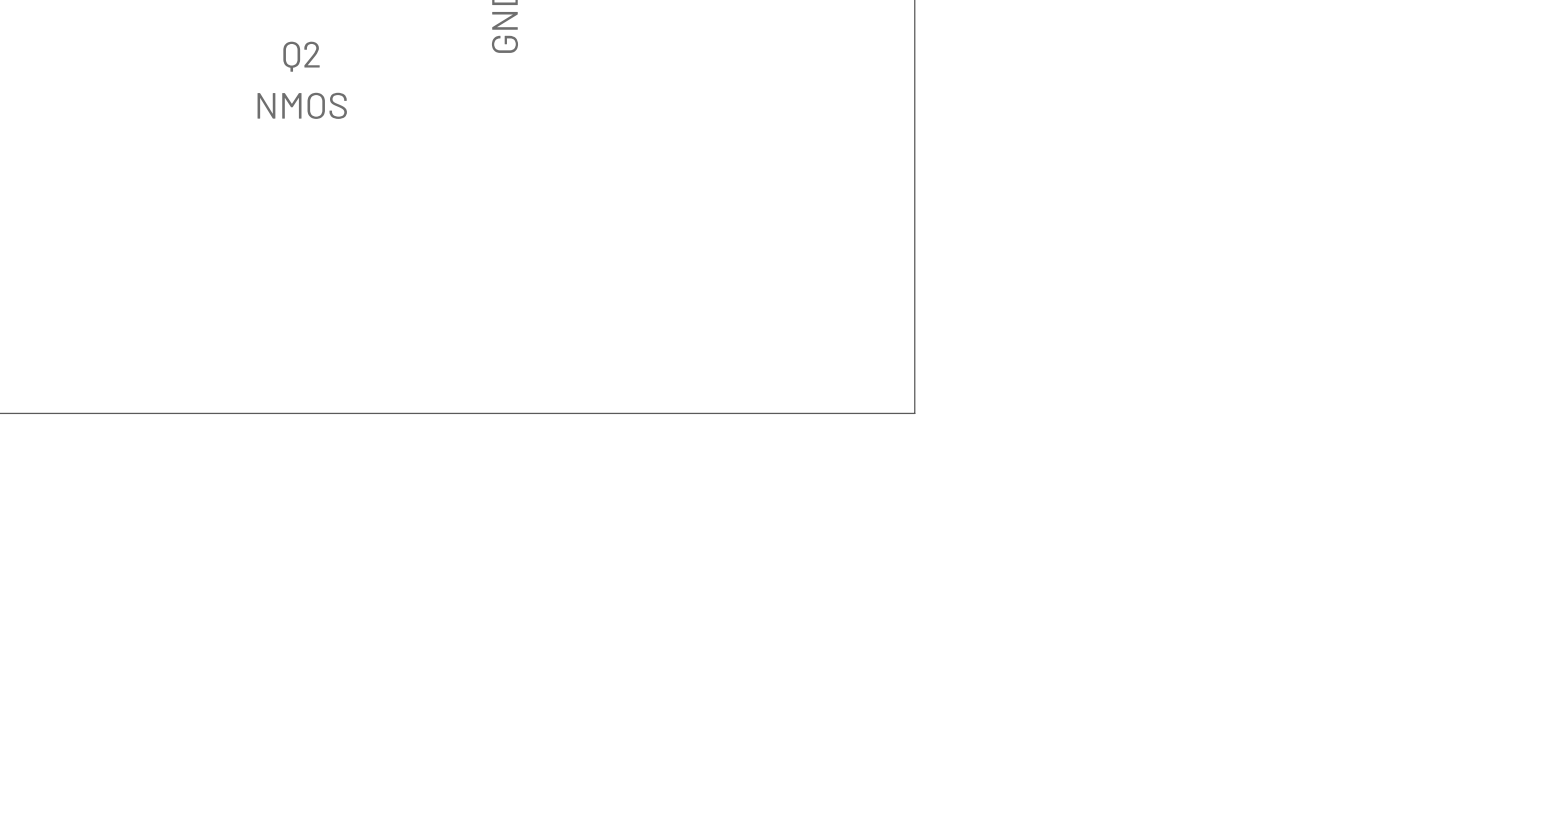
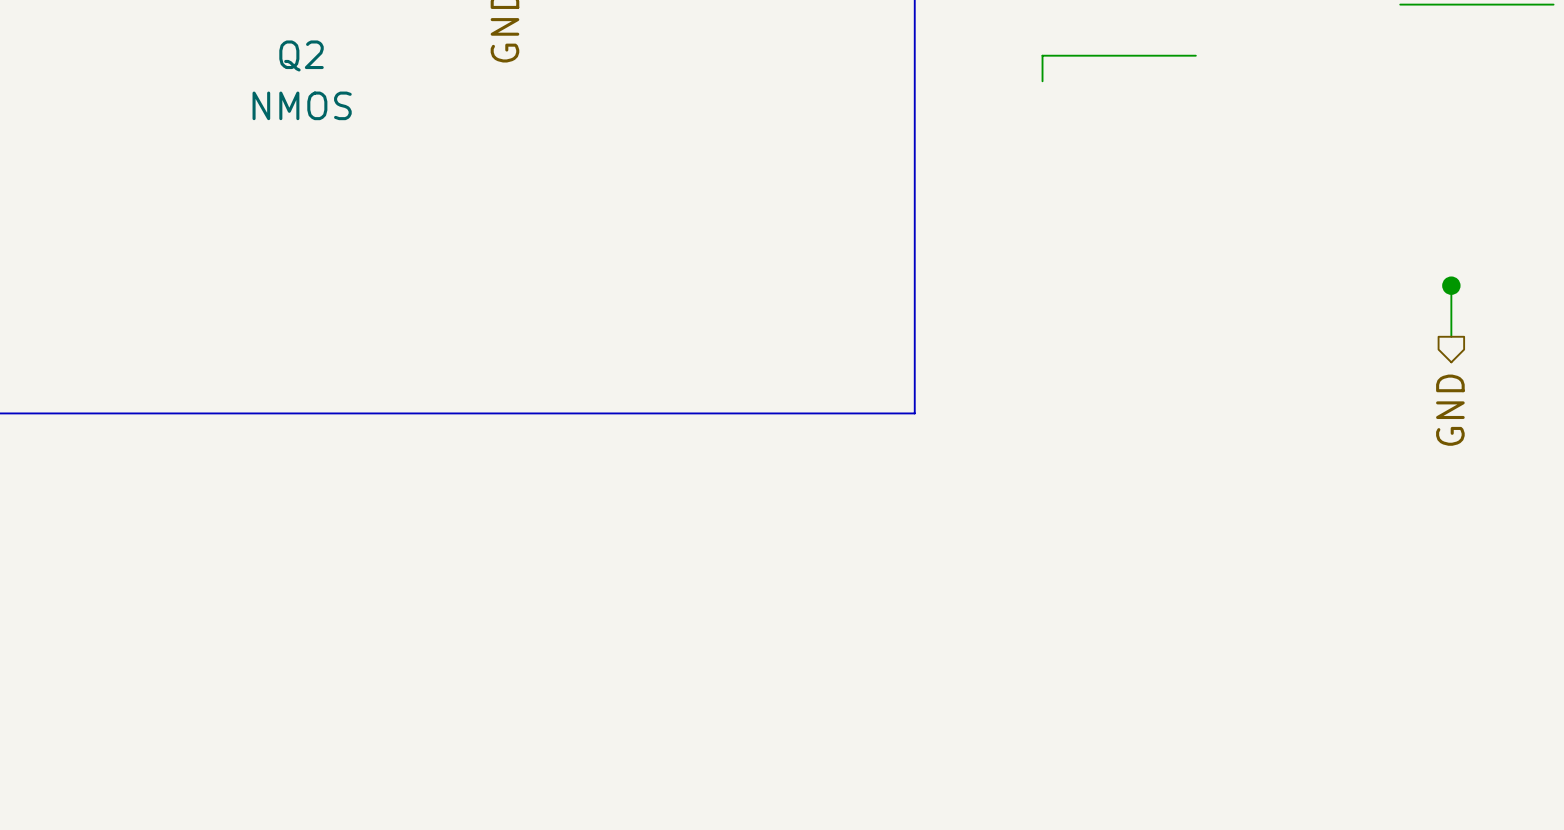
wire: none -> (1400, 4) (1553, 4)
wire: none -> (1195, 55) (1042, 55) (1042, 81)
wire: none -> (1451, 285) (1451, 336)
junction: none -> (1451, 285)
hierarchical label: none -> GND (1450, 410)

